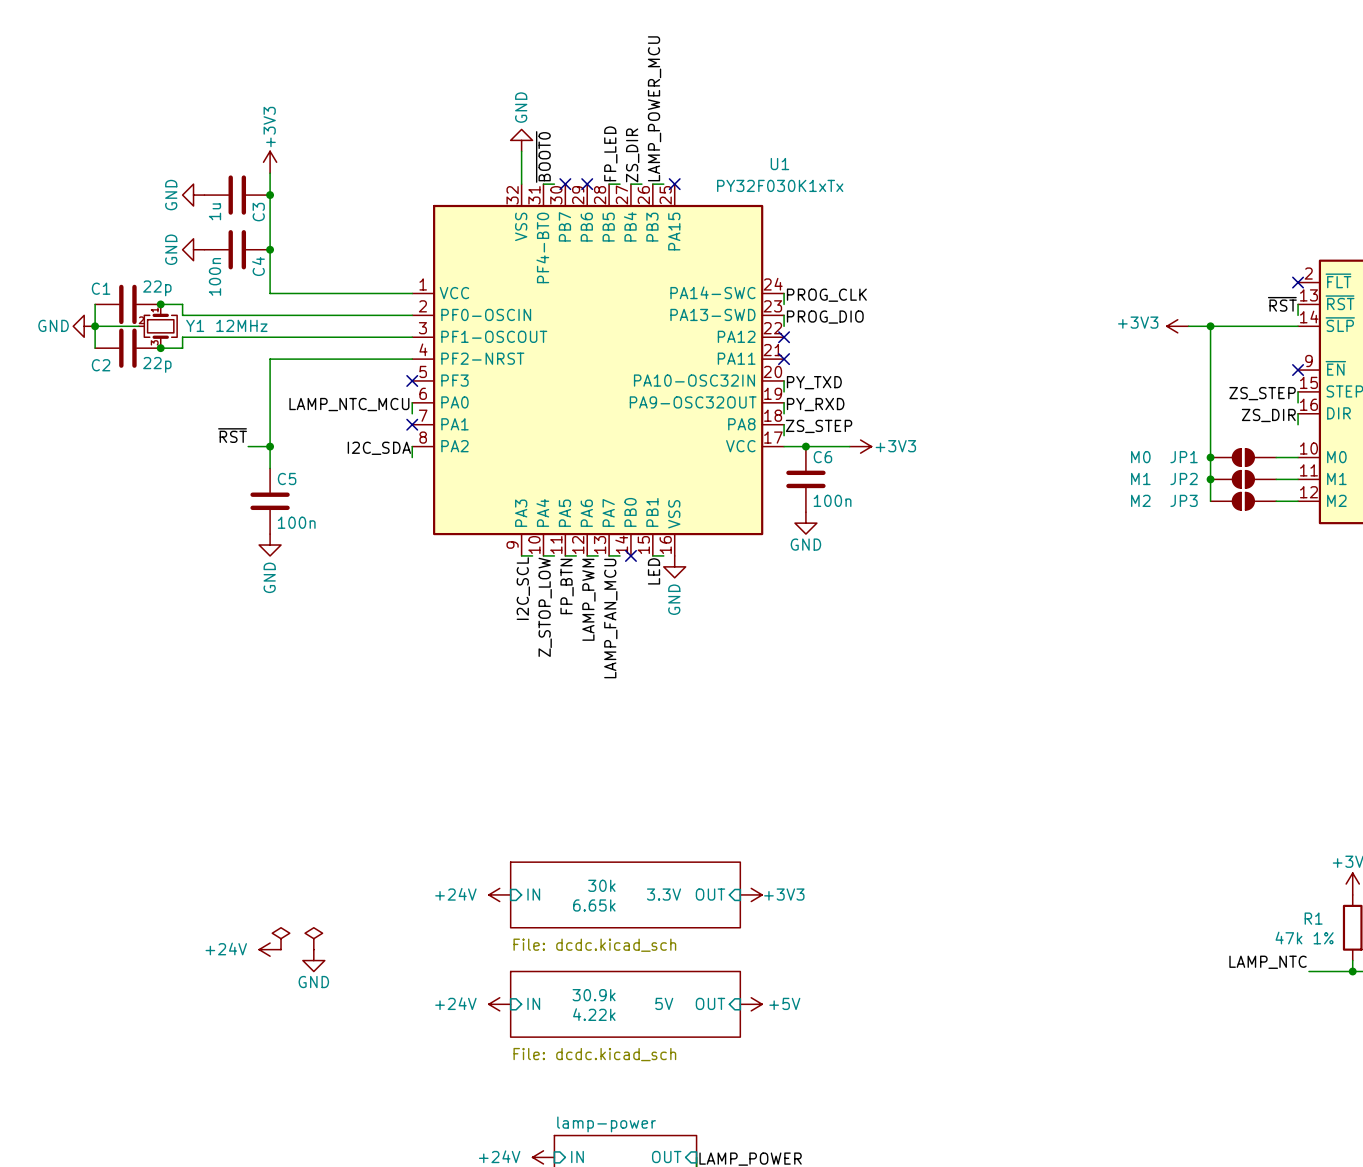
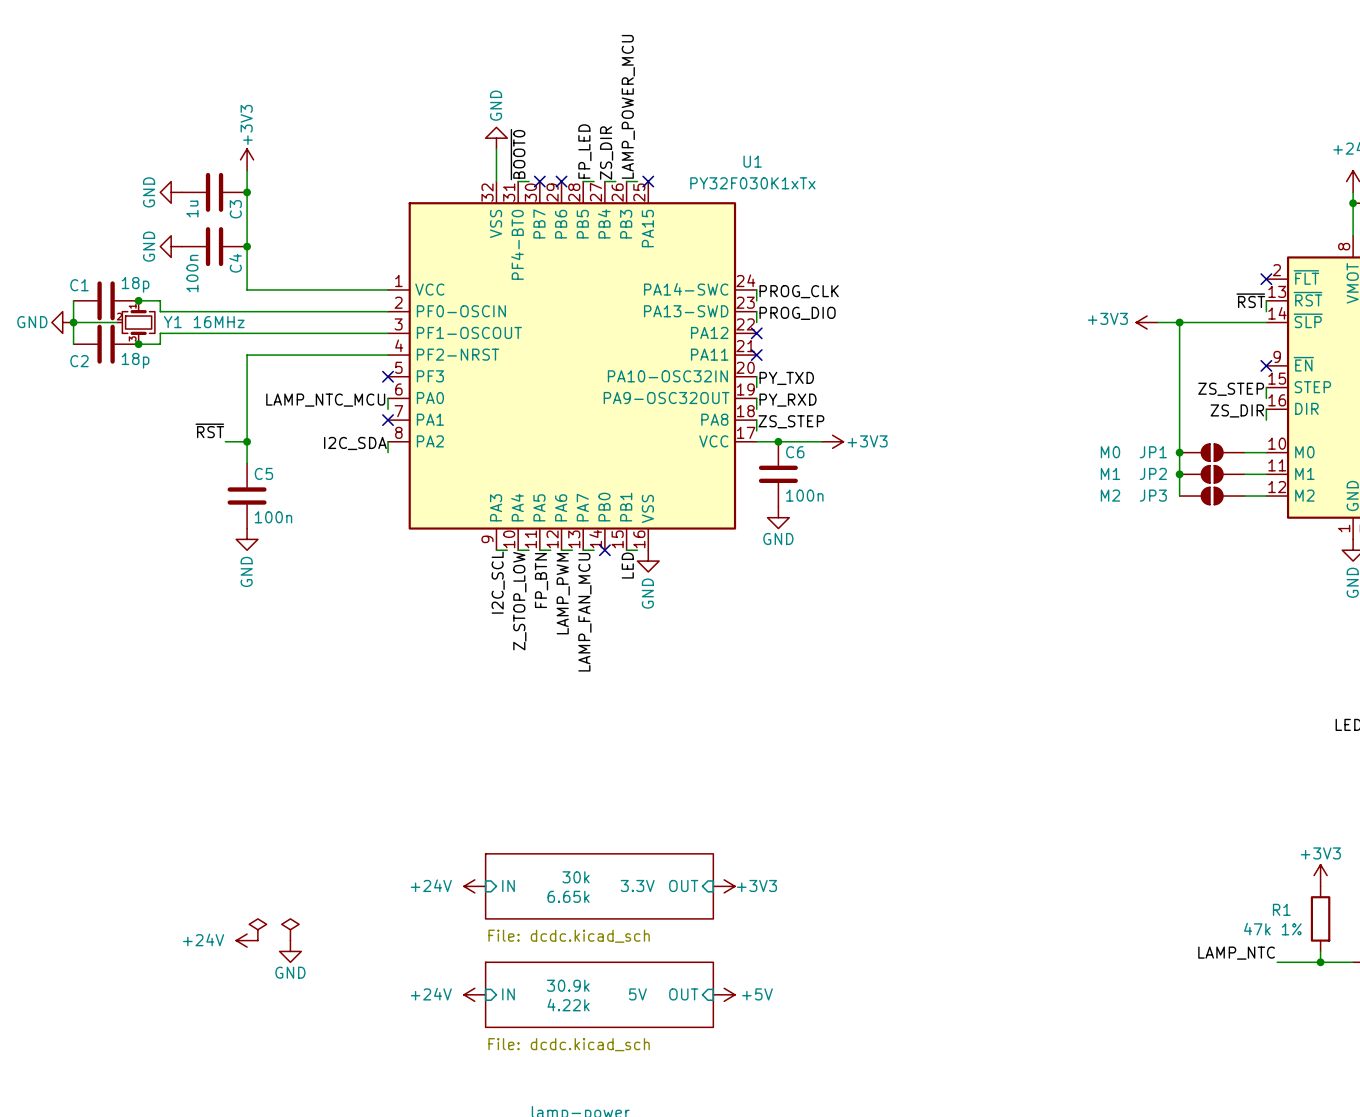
C1 value: 22p (157, 288) -> 18p (135, 284)
Y1 value: 12MHz (241, 325) -> 16MHz (219, 322)
C2 value: 22p (157, 364) -> 18p (135, 360)

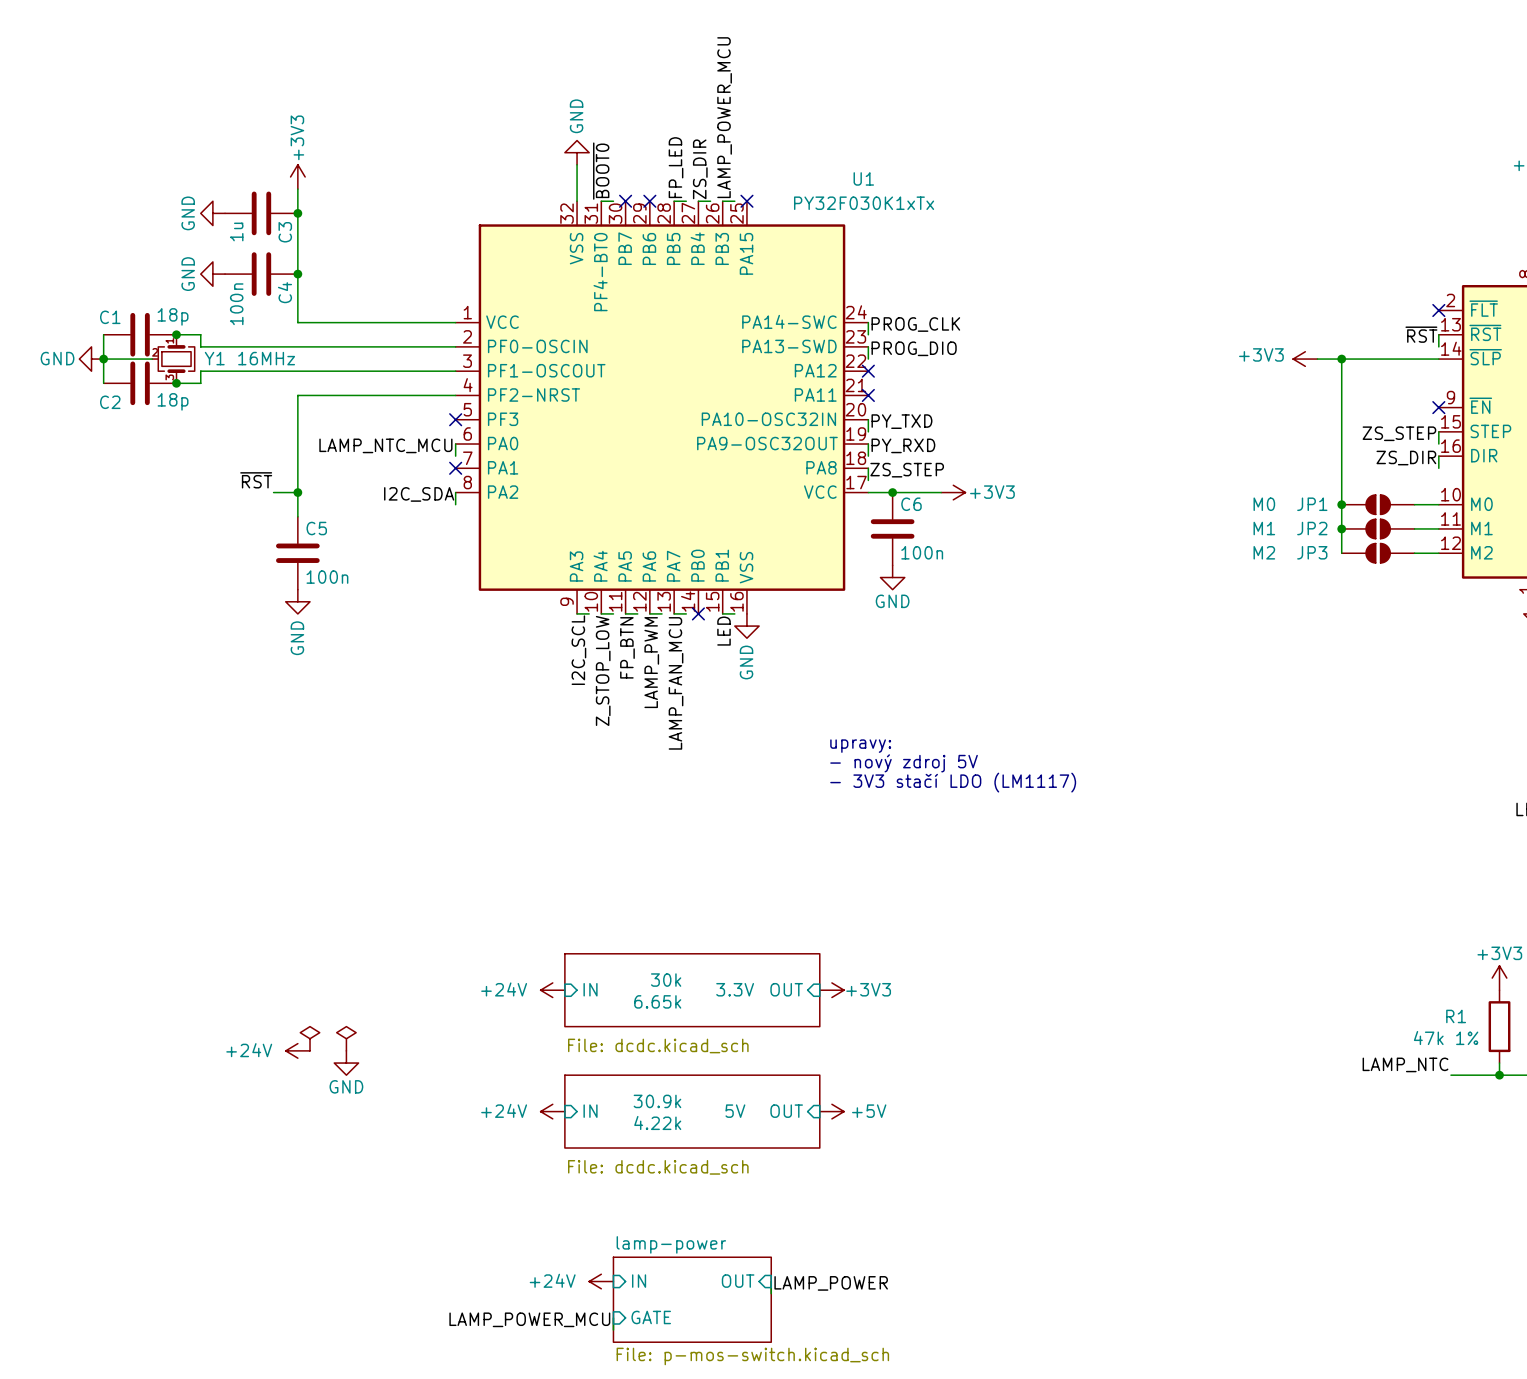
text: none -> upravy: (860, 746)
text: none -> - nový zdroj 5V (904, 763)
text: none -> - 3V3 stačí LDO (LM1117) (953, 782)

